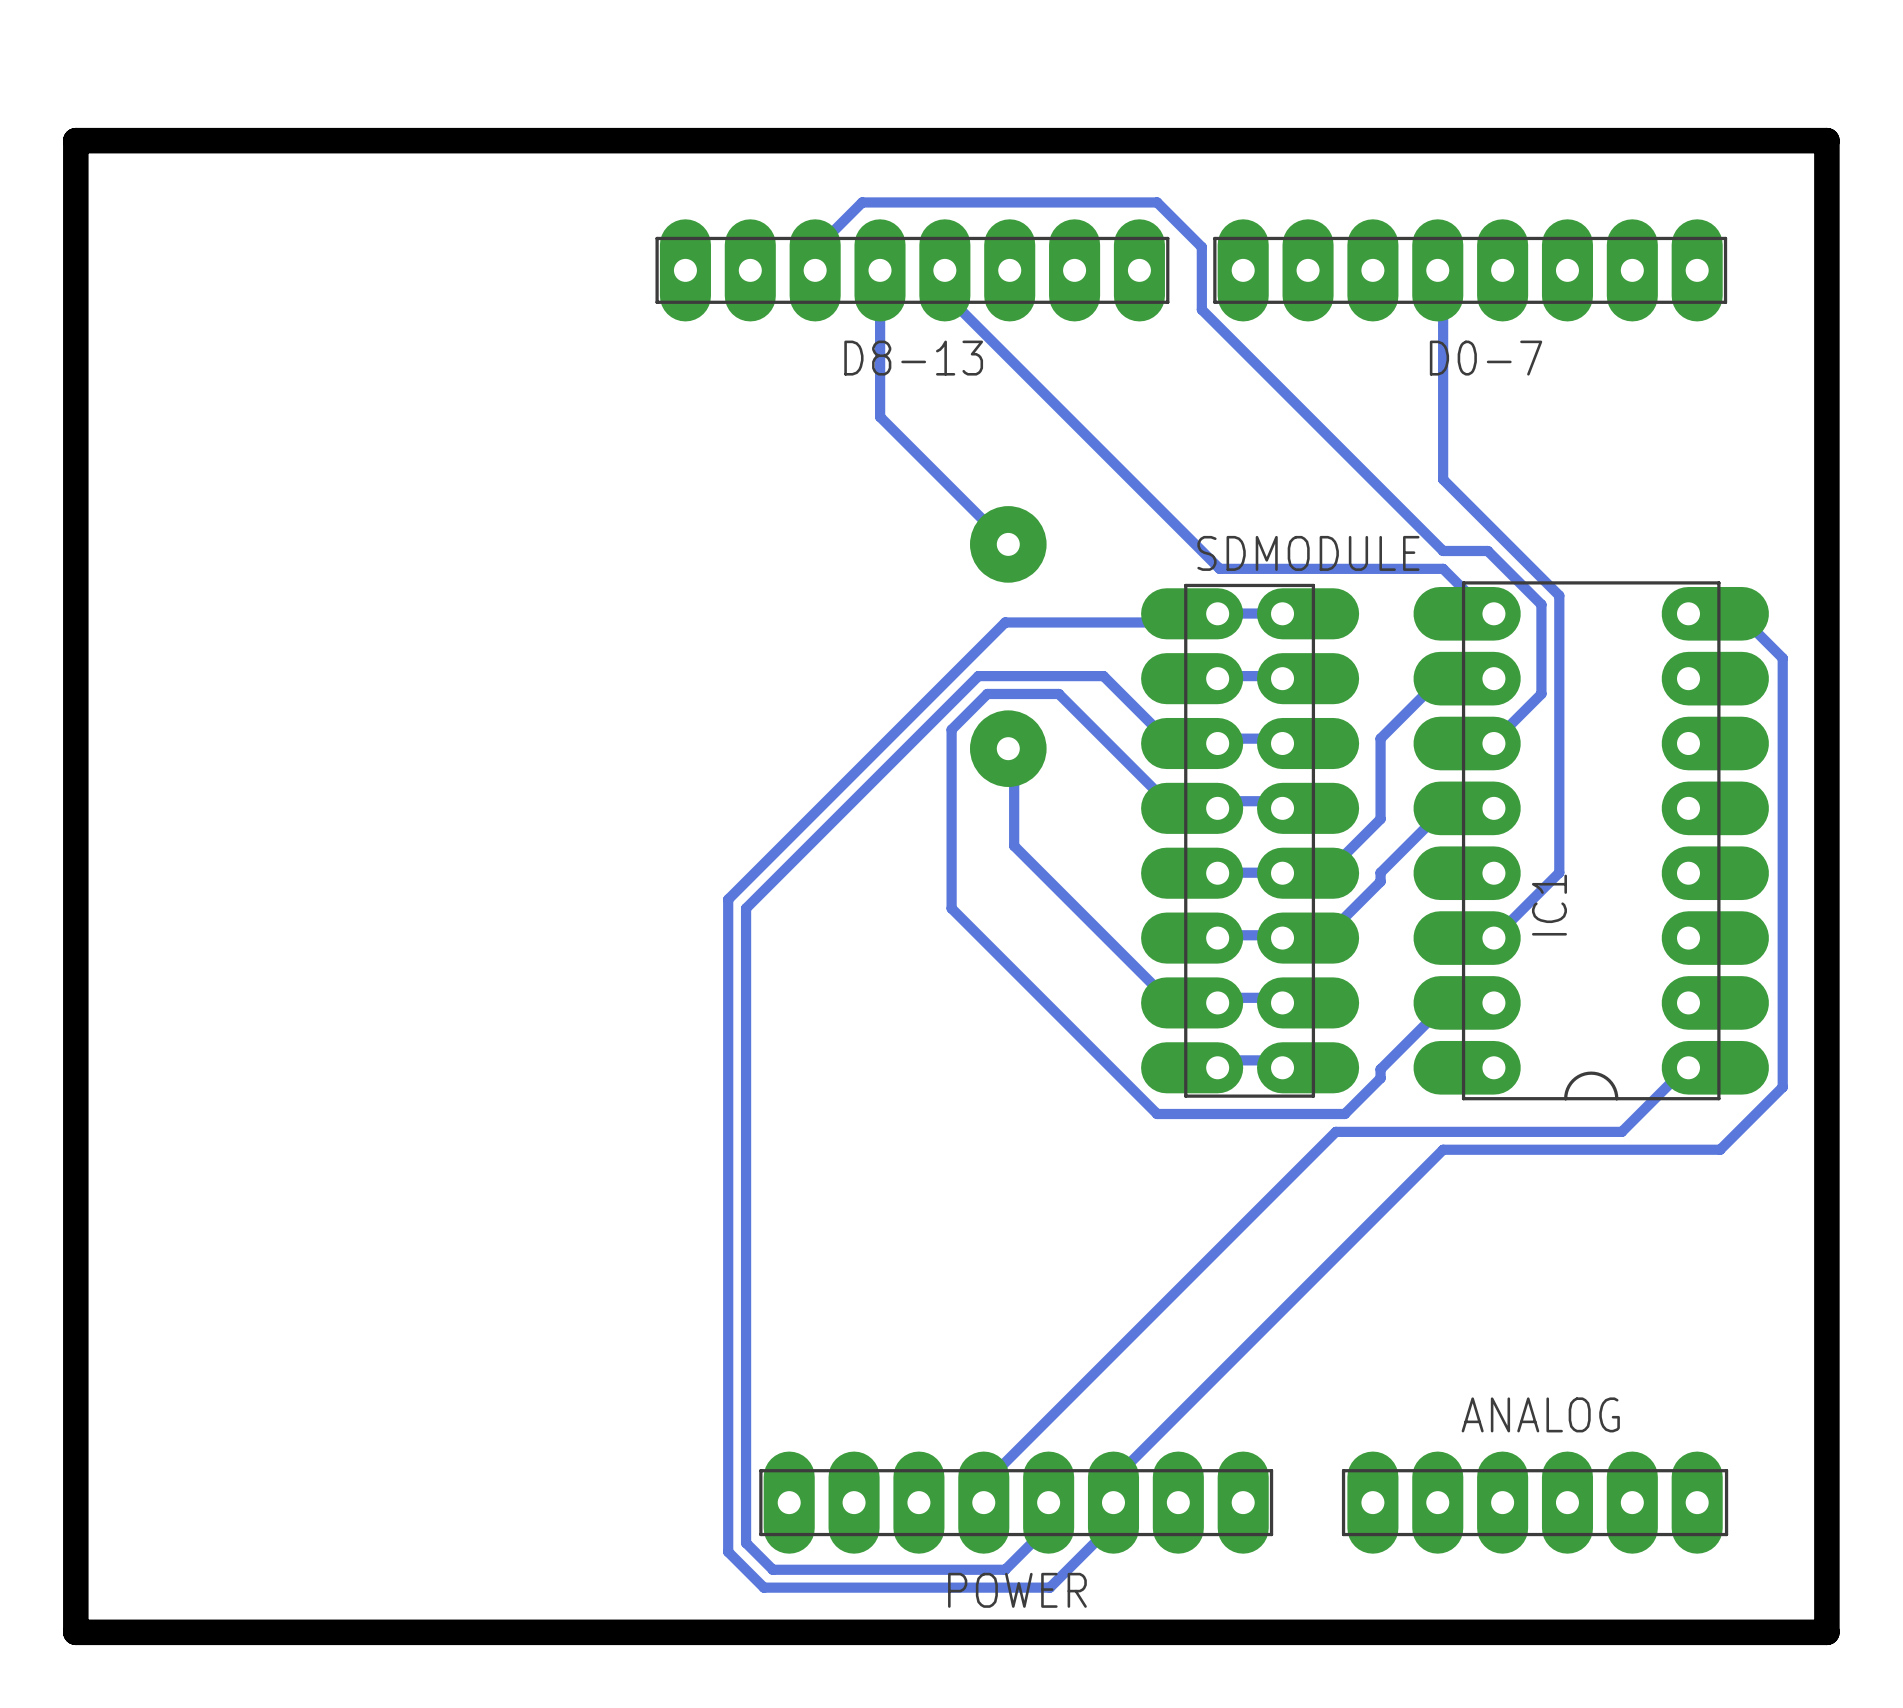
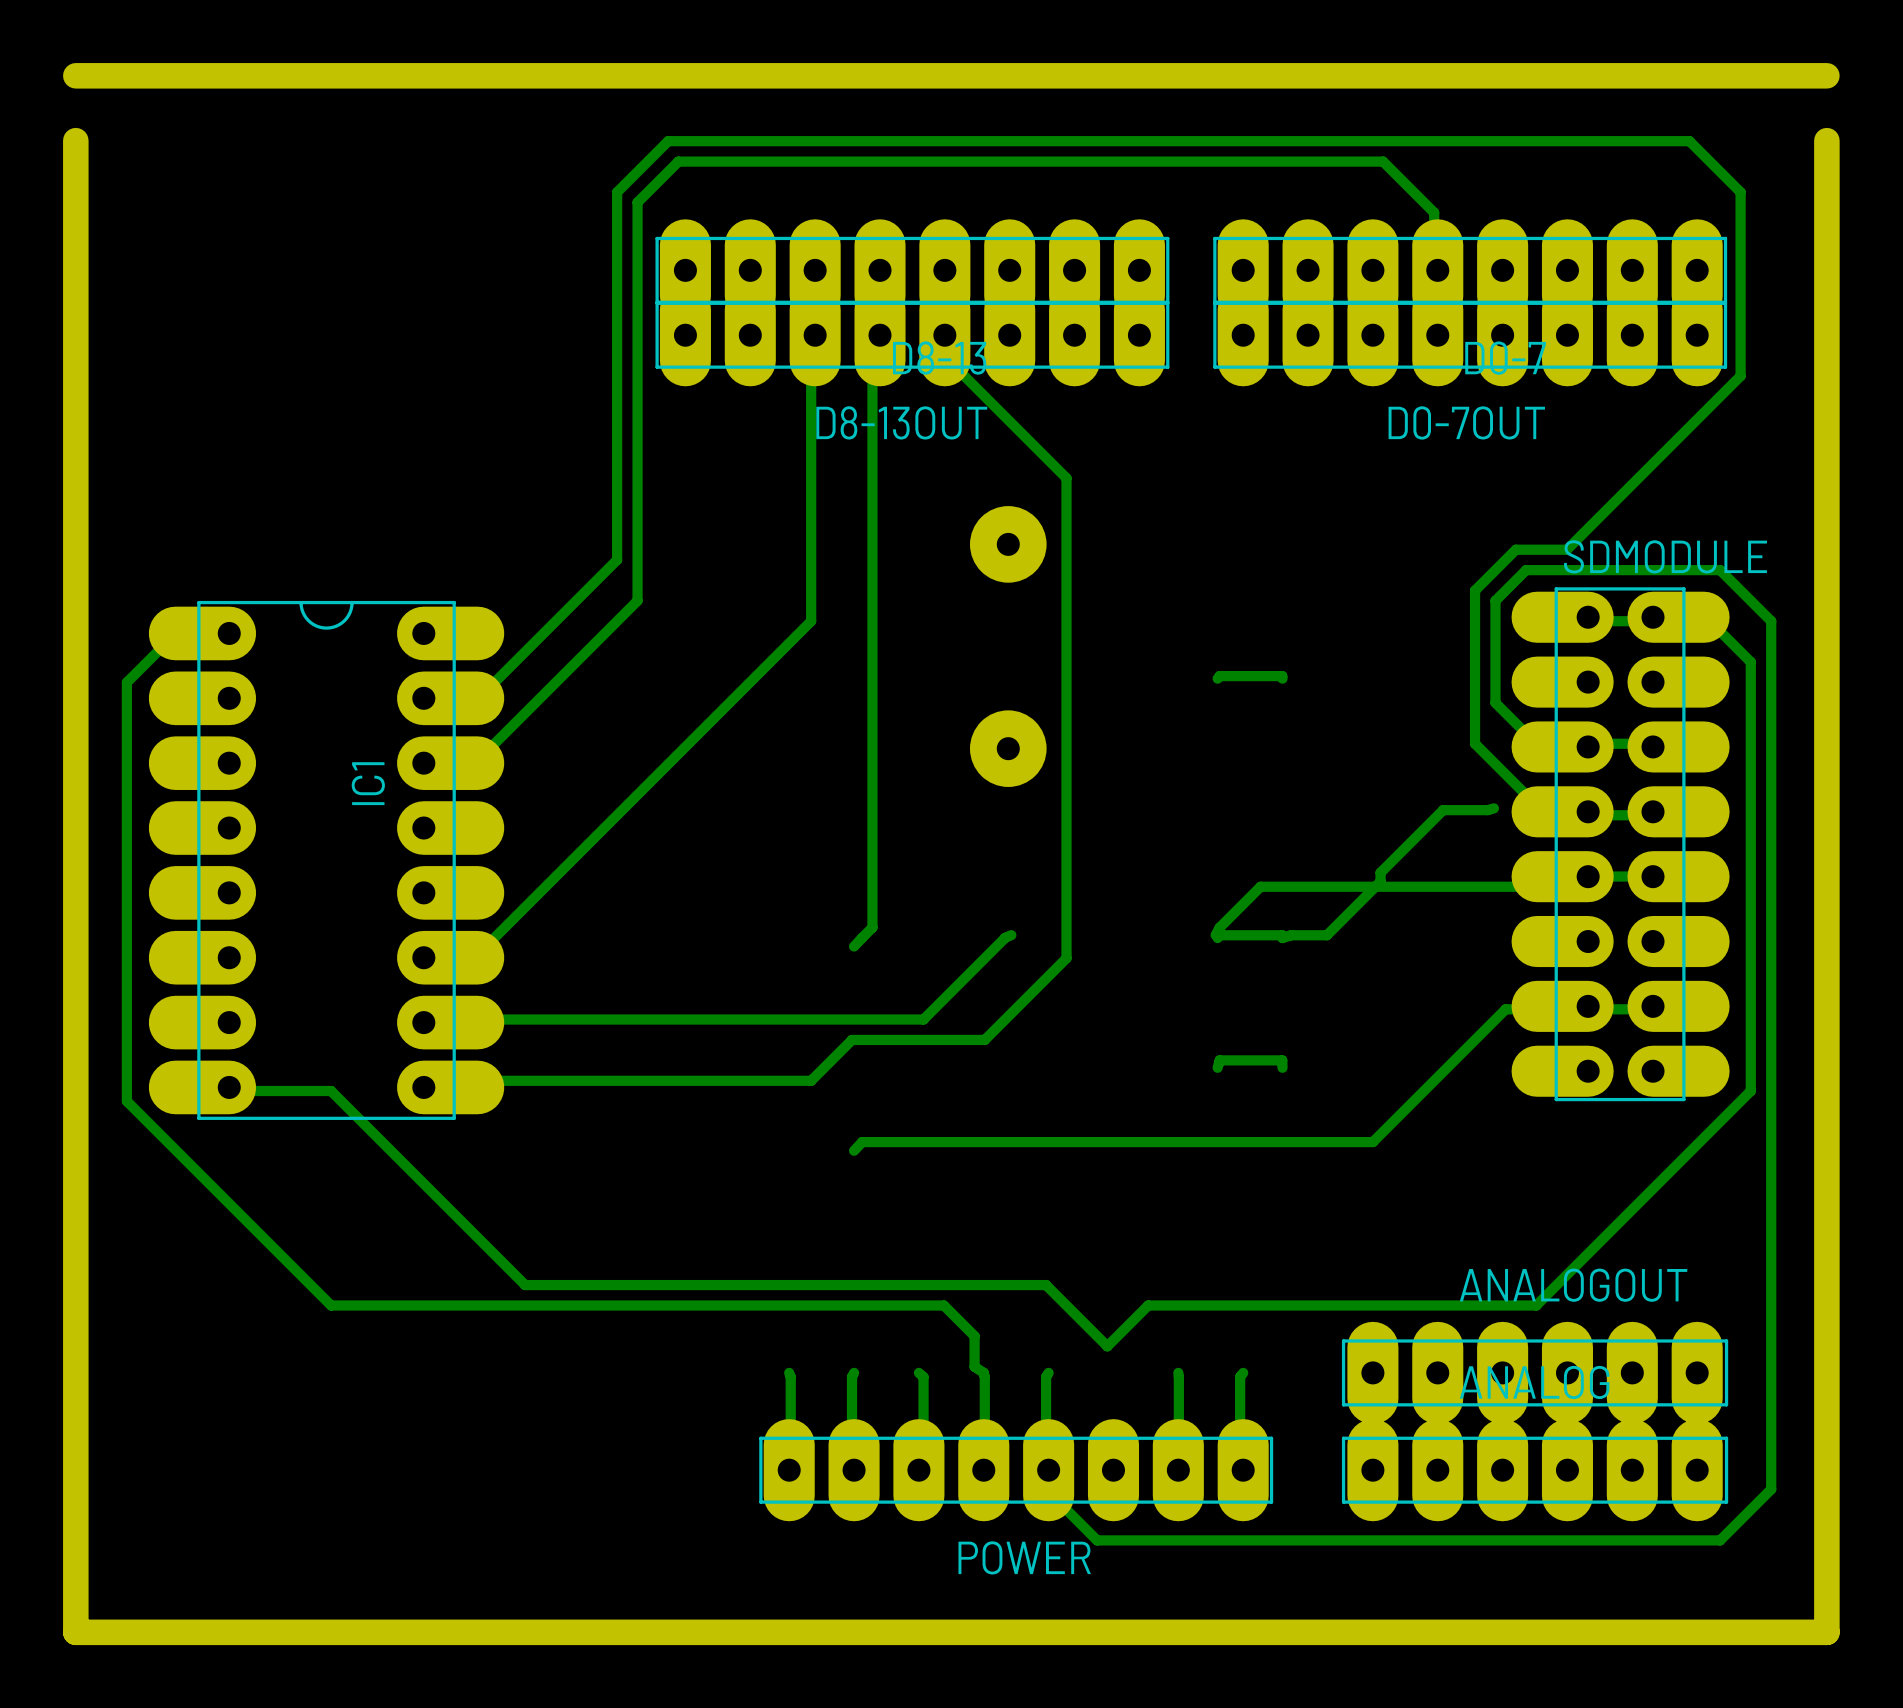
board edge: (75, 140) (1826, 140) (75, 140) -> (75, 75) (1826, 75) (75, 75)
bottom track: none -> (815, 237) (811, 243) (811, 621) (484, 948) (433, 948) (423, 957)
bottom track: none -> (880, 237) (882, 243) (882, 335) (872, 335) (872, 927) (854, 946)
bottom track: none -> (944, 237) (943, 335) (954, 335) (954, 365) (1066, 478) (1066, 958) (984, 1039) (852, 1039) (811, 1080) (433, 1080) (423, 1087)
bottom track: (815, 270) (817, 265) (817, 247) (862, 202) (1157, 202) (1201, 247) (1201, 309) (1443, 550) (1487, 550) (1541, 604) (1541, 693) (1493, 743) -> none
bottom track: (880, 270) (880, 416) (1008, 544) -> none
bottom track: (944, 270) (951, 273) (951, 300) (1219, 568) (1443, 568) (1487, 613) (1493, 613) -> none
bottom track: (1437, 270) (1443, 273) (1443, 479) (1559, 595) (1559, 872) (1493, 938) -> none
D8-13OUT: none -> (912, 335)
bottom track: none -> (1437, 335) (1434, 335) (1434, 243) (1437, 237) (1434, 233) (1434, 212) (1383, 161) (678, 161) (637, 202) (637, 600) (484, 753) (433, 753) (423, 763)
D0-7OUT: none -> (1470, 335)
bottom track: (1282, 613) (1217, 613) (1210, 622) (1005, 622) (728, 899) (728, 1551) (763, 1587) (1049, 1587) (1112, 1525) (1113, 1502) (1121, 1498) (1121, 1471) (1443, 1149) (1720, 1149) (1782, 1087) (1782, 658) (1746, 622) (1693, 622) (1688, 613) -> none
bottom track: none -> (1588, 617) (1597, 621) (1648, 621) (1653, 617) (1658, 621) (1709, 621) (1750, 662) (1750, 1091) (1536, 1305) (1148, 1305) (1107, 1346) (1046, 1285) (525, 1285) (331, 1091) (239, 1091) (229, 1087)
bottom track: none -> (229, 633) (229, 641) (167, 641) (126, 682) (126, 1101) (331, 1305) (943, 1305) (974, 1336) (974, 1366) (983, 1372) (984, 1376) (983, 1470)
bottom track: (1493, 678) (1487, 685) (1434, 685) (1380, 738) (1380, 819) (1326, 872) (1217, 873) -> none
bottom track: none -> (423, 698) (433, 692) (484, 692) (617, 559) (617, 192) (668, 141) (1689, 141) (1740, 192) (1740, 376) (1566, 549) (1515, 549) (1475, 590) (1475, 743) (1536, 805) (1587, 805) (1588, 811) (1597, 815) (1648, 815) (1653, 811)
bottom track: (1282, 743) (1282, 738) (1219, 738) (1217, 743) (1210, 738) (1166, 738) (1103, 676) (978, 676) (746, 908) (746, 1542) (772, 1569) (1005, 1569) (1040, 1534) (1040, 1507) (1048, 1502) -> none
bottom track: none -> (1653, 746) (1648, 743) (1597, 743) (1588, 746) (1587, 743) (1536, 743) (1495, 702) (1495, 600) (1526, 570) (1720, 570) (1771, 621) (1771, 1489) (1720, 1540) (1097, 1540) (1056, 1499) (1056, 1479) (1046, 1468) (1046, 1376) (1048, 1372)
bottom track: (1008, 748) (1014, 756) (1014, 845) (1166, 997) (1210, 997) (1217, 1002) (1219, 997) (1282, 997) (1282, 1002) -> none
bottom track: (1282, 808) (1282, 801) (1219, 801) (1217, 808) (1210, 801) (1166, 801) (1058, 693) (987, 693) (951, 729) (951, 908) (1157, 1114) (1344, 1114) (1380, 1078) (1380, 1069) (1443, 1006) (1487, 1006) (1493, 1002) -> none
SDMODULE position: (1250, 840) -> (1620, 844)
IC1 rotation: 0° (1591, 840) -> 180° (326, 860)
IC1 position: (1591, 840) -> (326, 860)
bottom track: none -> (1653, 876) (1588, 876) (1587, 886) (1260, 886) (1219, 927) (1215, 935)
bottom track: none -> (1011, 935) (1005, 937) (923, 1019) (433, 1019) (423, 1022)
bottom track: none -> (1653, 1006) (1648, 1009) (1597, 1009) (1588, 1006) (1587, 1009) (1505, 1009) (1372, 1142) (862, 1142) (854, 1150)
bottom track: (1688, 1067) (1684, 1069) (1621, 1131) (1335, 1131) (987, 1480) (987, 1498) (983, 1502) -> none
bottom track: none -> (789, 1372) (790, 1376) (790, 1468) (789, 1470)
bottom track: none -> (854, 1372) (852, 1376) (852, 1468) (854, 1470)
bottom track: none -> (918, 1372) (923, 1376) (923, 1468) (918, 1470)
bottom track: none -> (1178, 1372) (1178, 1470)
bottom track: none -> (1243, 1372) (1240, 1376) (1240, 1468) (1243, 1470)
ANALOGOUT: none -> (1535, 1372)
POWER position: (1016, 1502) -> (1016, 1470)
ANALOG position: (1535, 1502) -> (1535, 1470)

